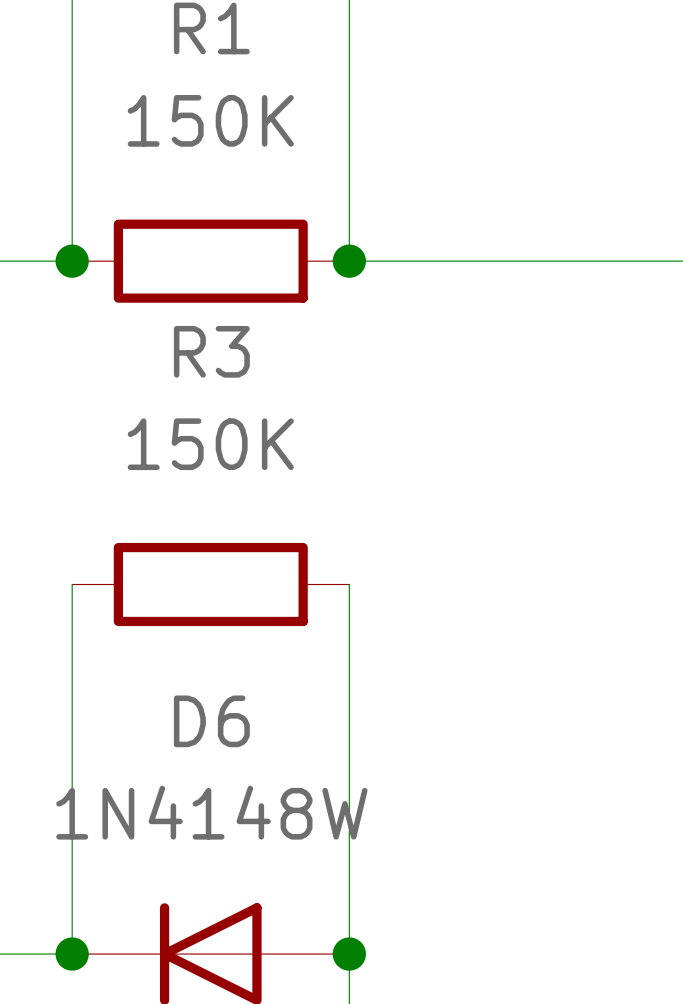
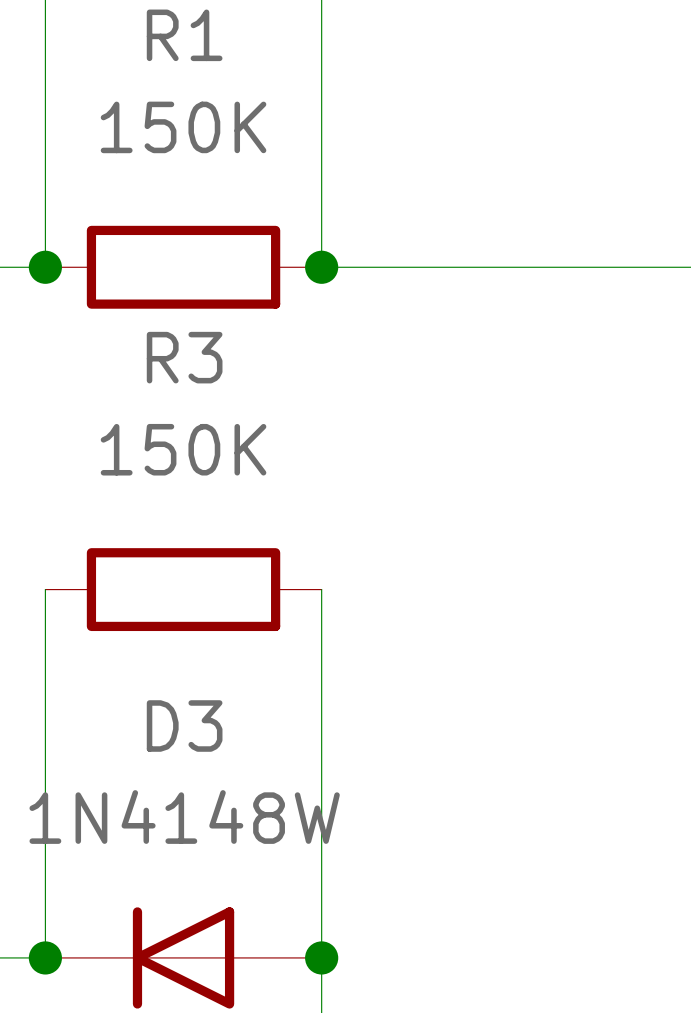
D6 name: D6 (211, 721) -> D3 (184, 726)

